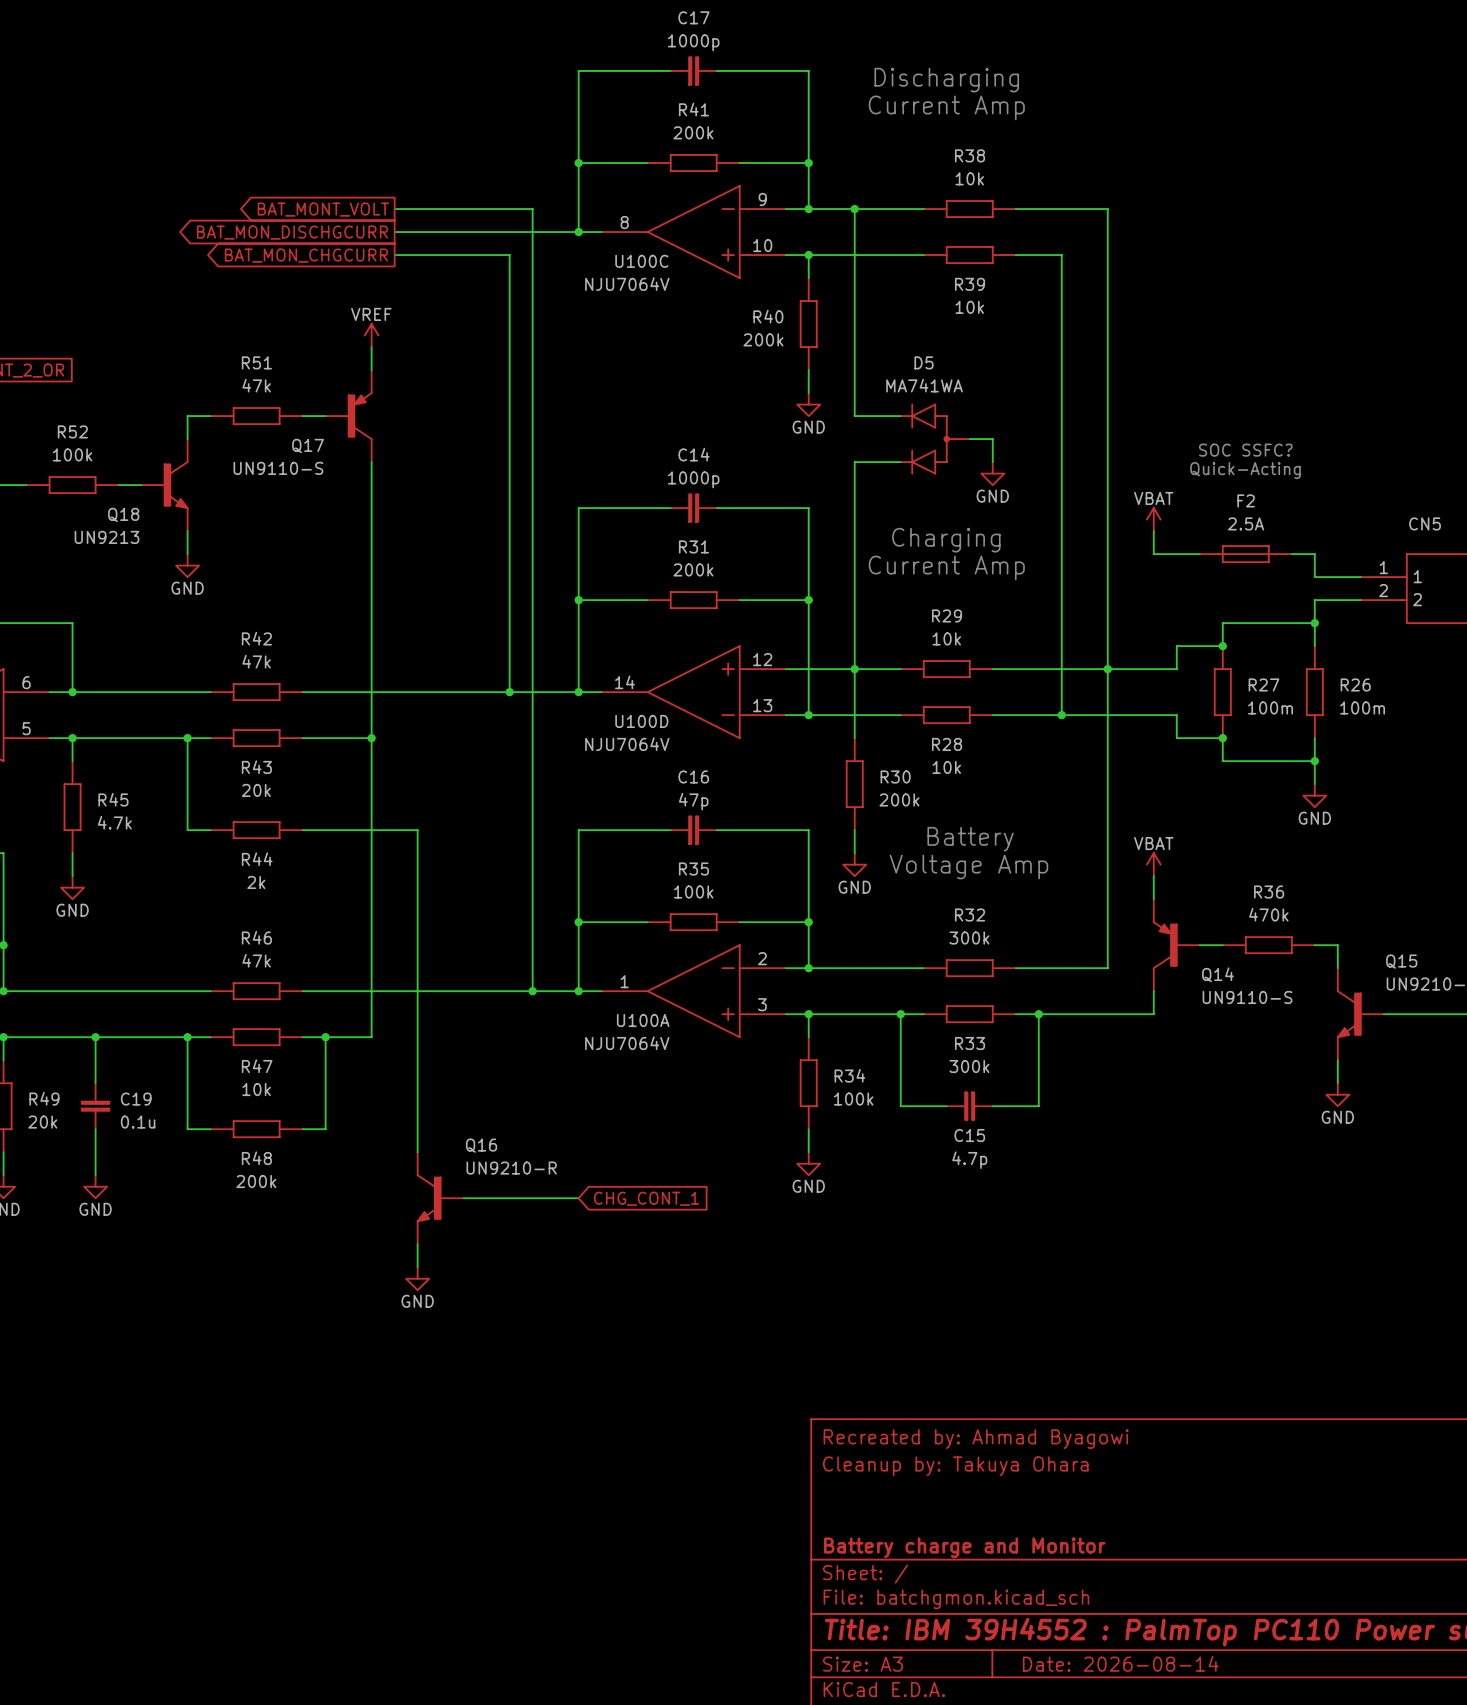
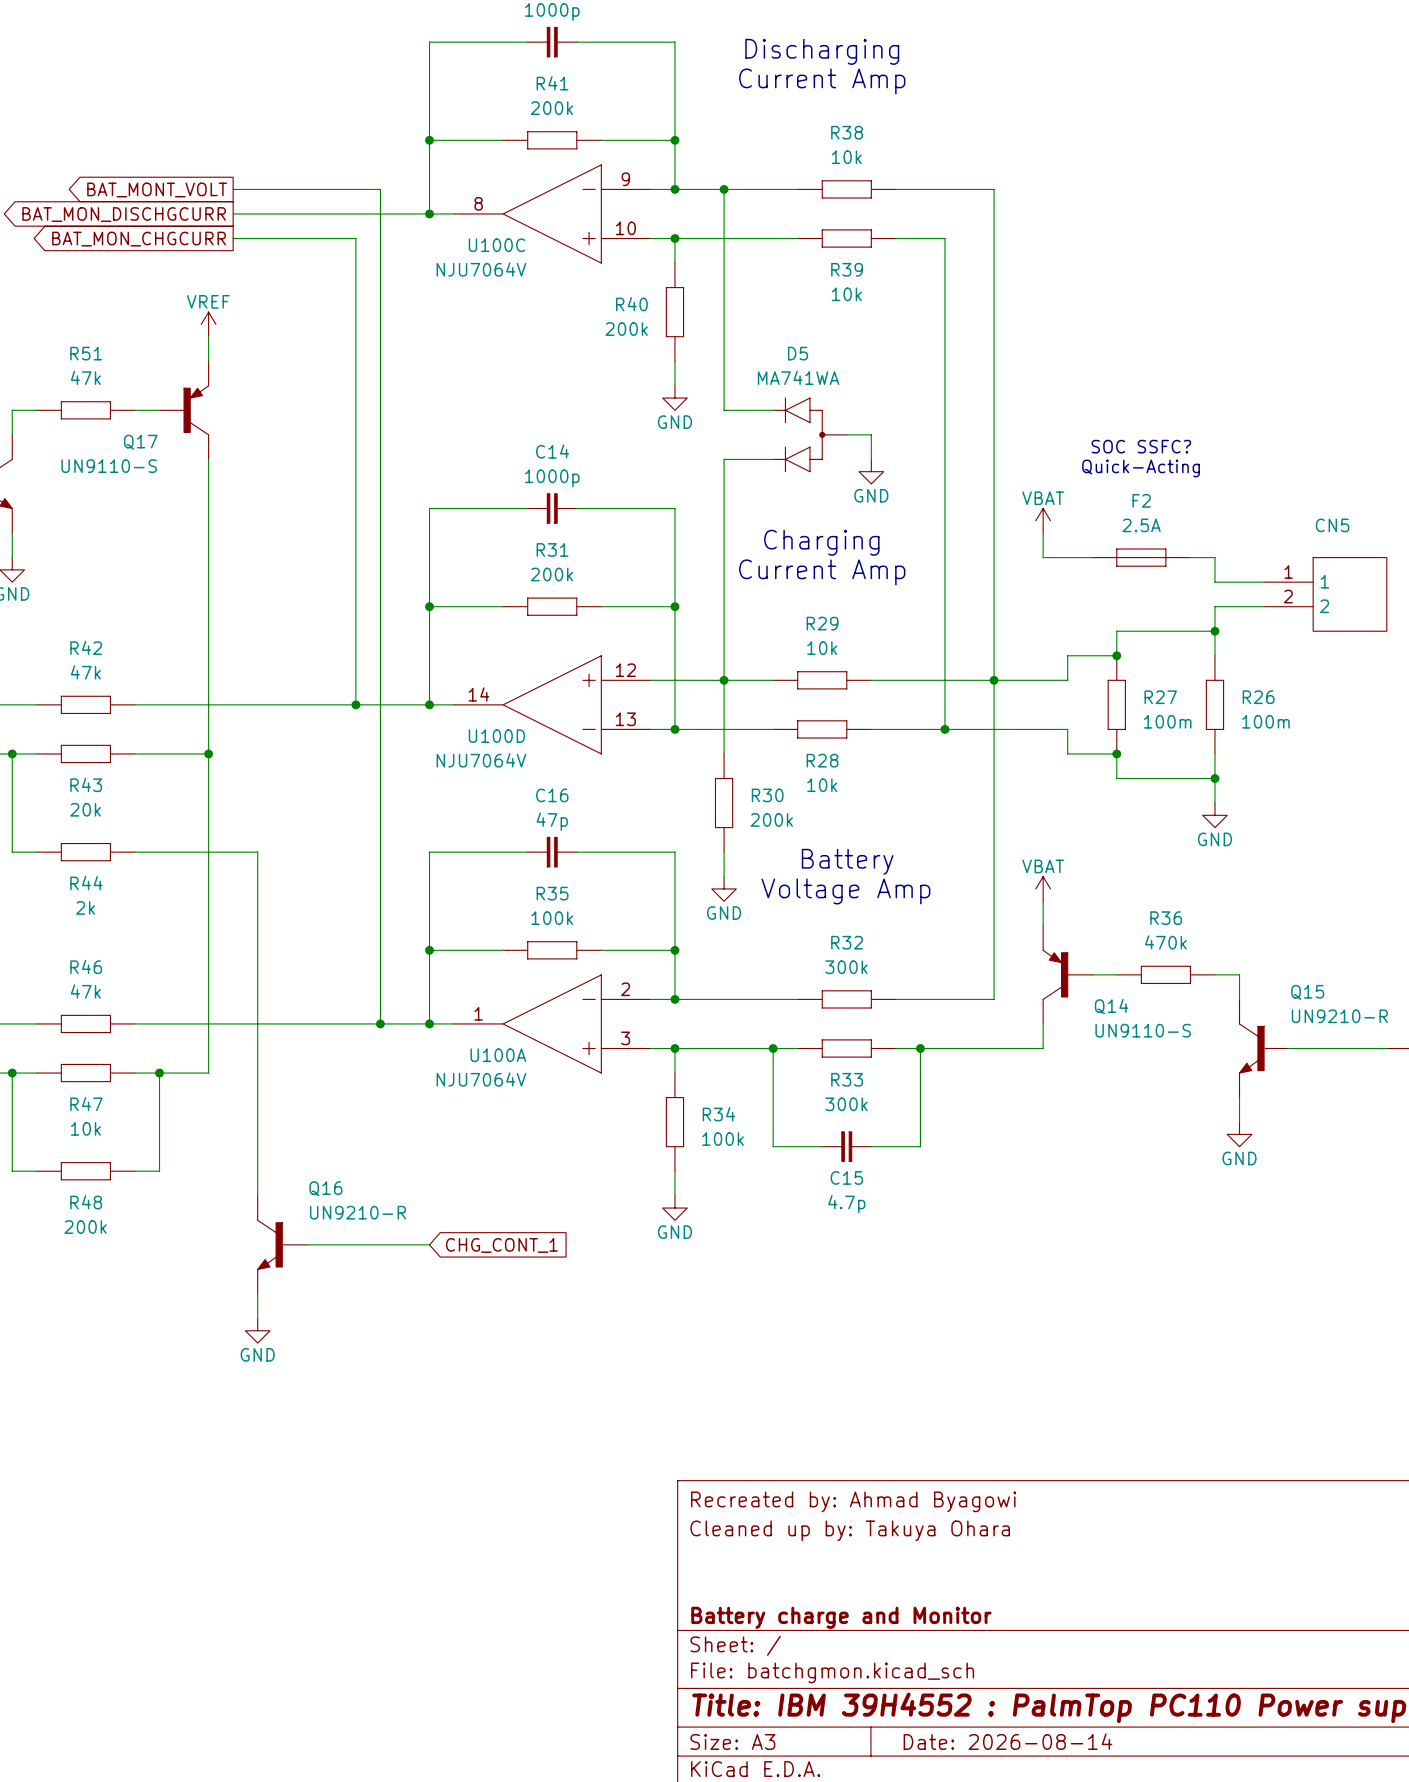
title block: Cleanup by: Takuya Ohara (955, 1466) -> Cleaned up by: Takuya Ohara (850, 1530)

